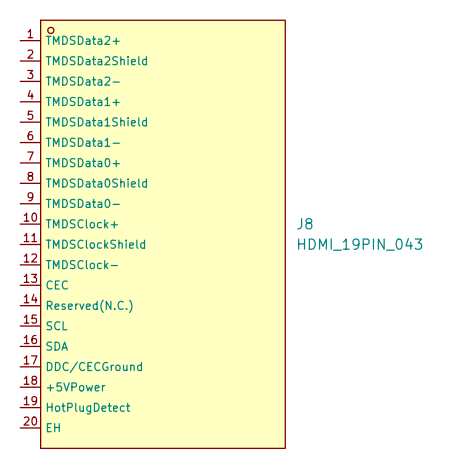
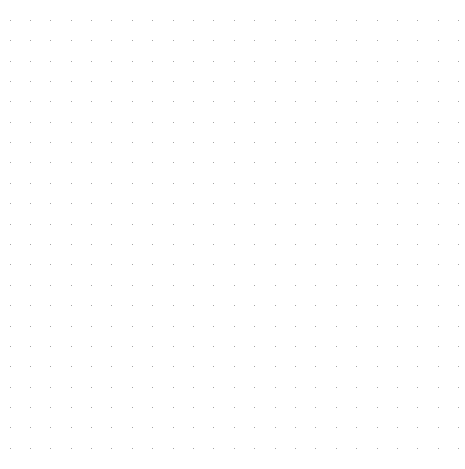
J8: HDMI_19PIN_043 (152, 234) -> none

